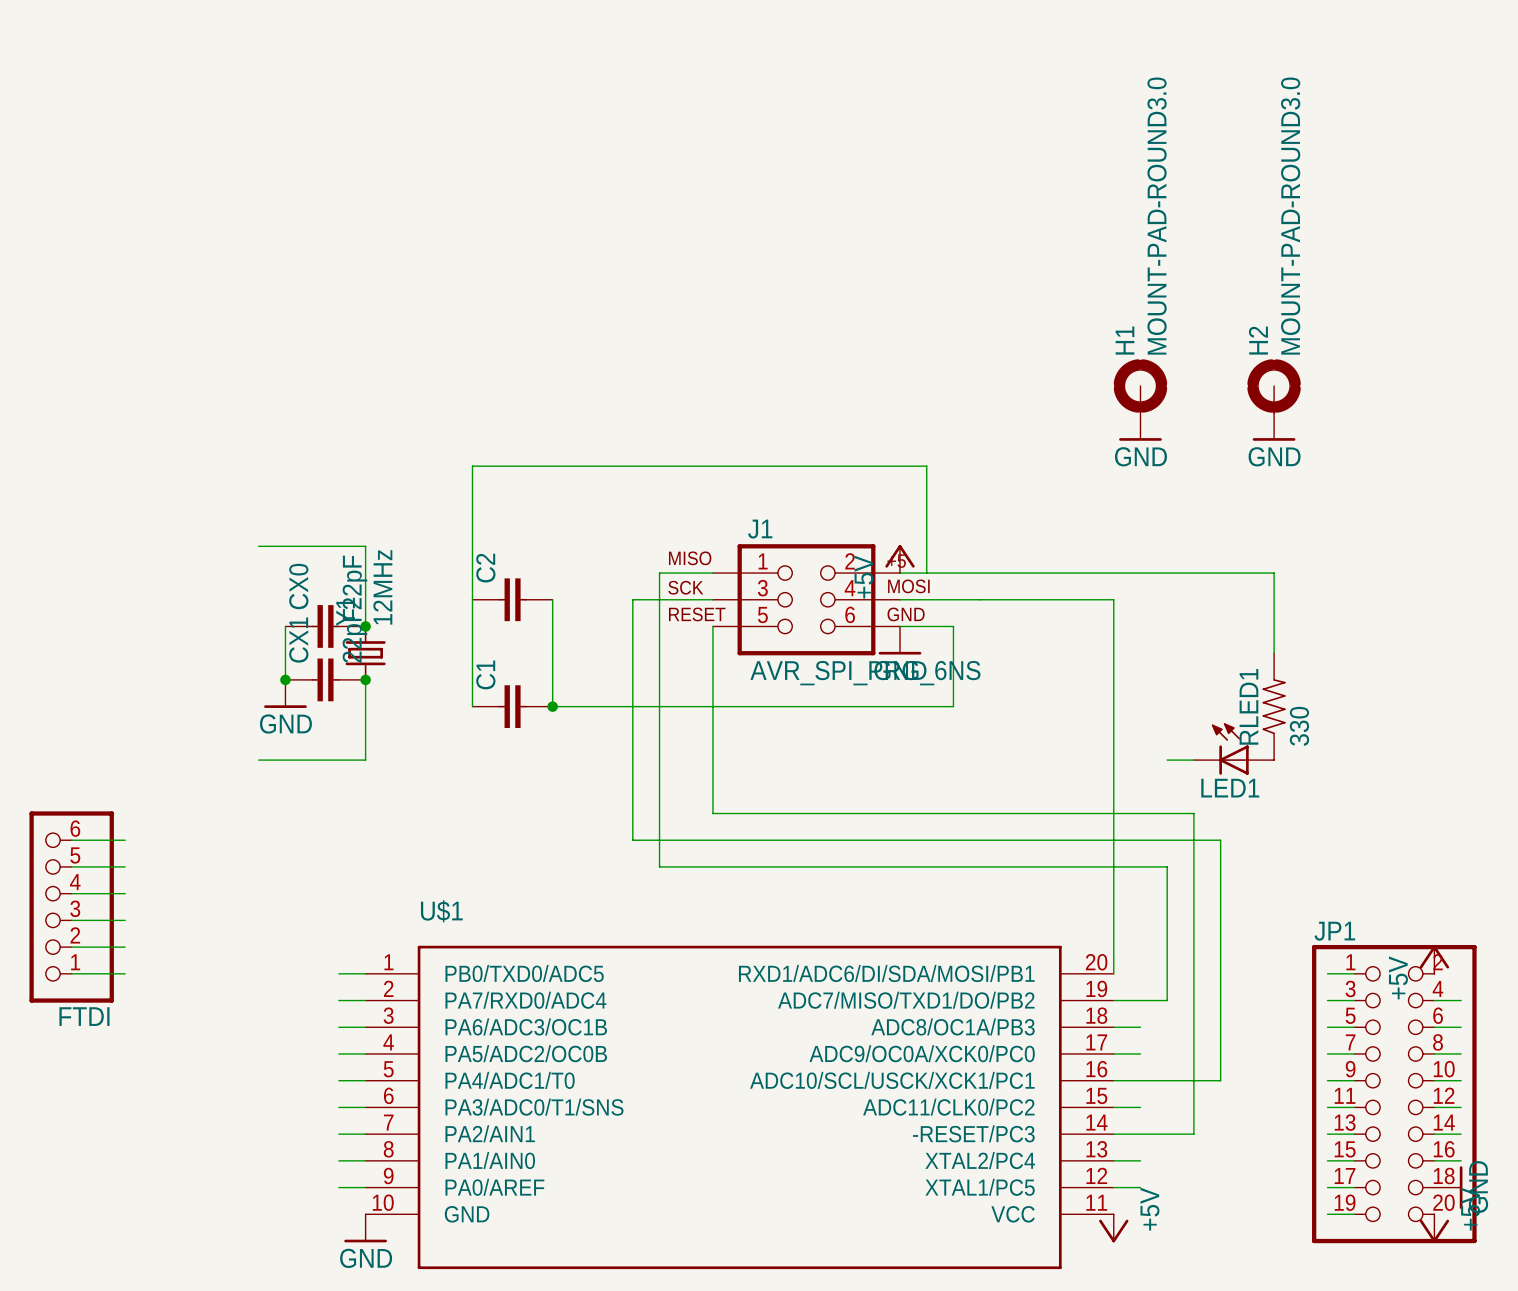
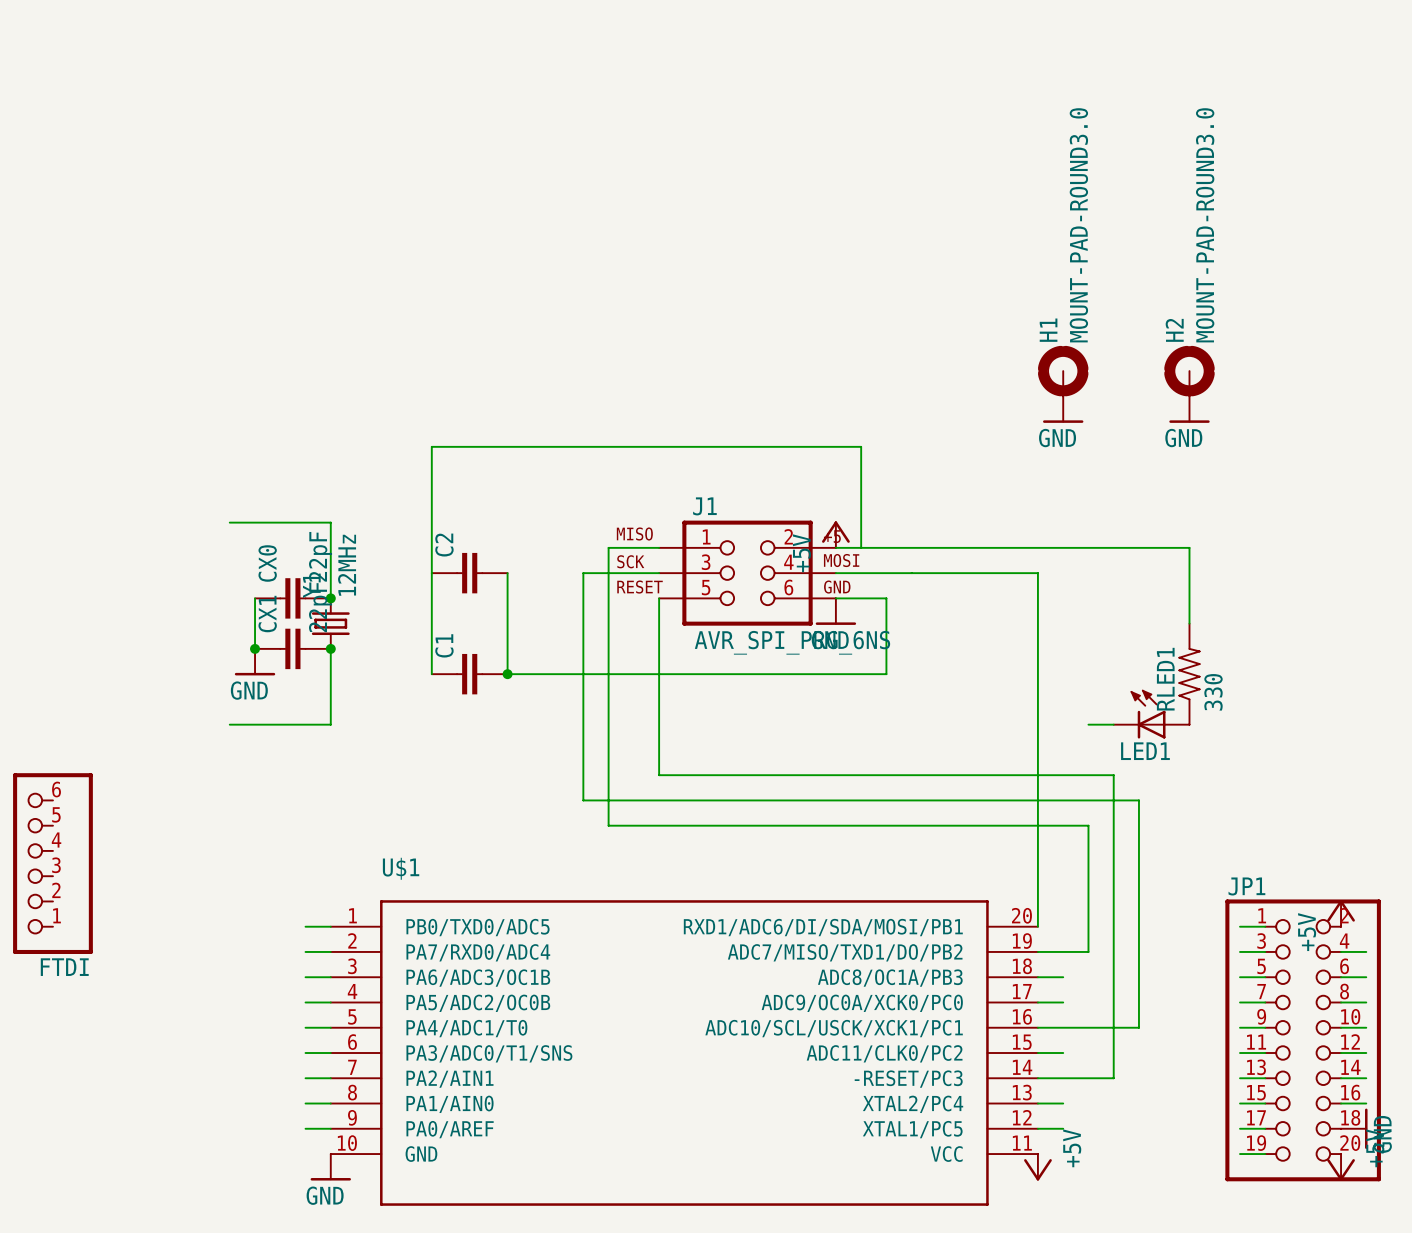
wire: (71, 840) (125, 840) -> none
wire: (71, 866) (125, 866) -> none
wire: (71, 893) (125, 893) -> none
wire: (71, 920) (125, 920) -> none
wire: (71, 947) (125, 947) -> none
wire: (71, 973) (125, 973) -> none

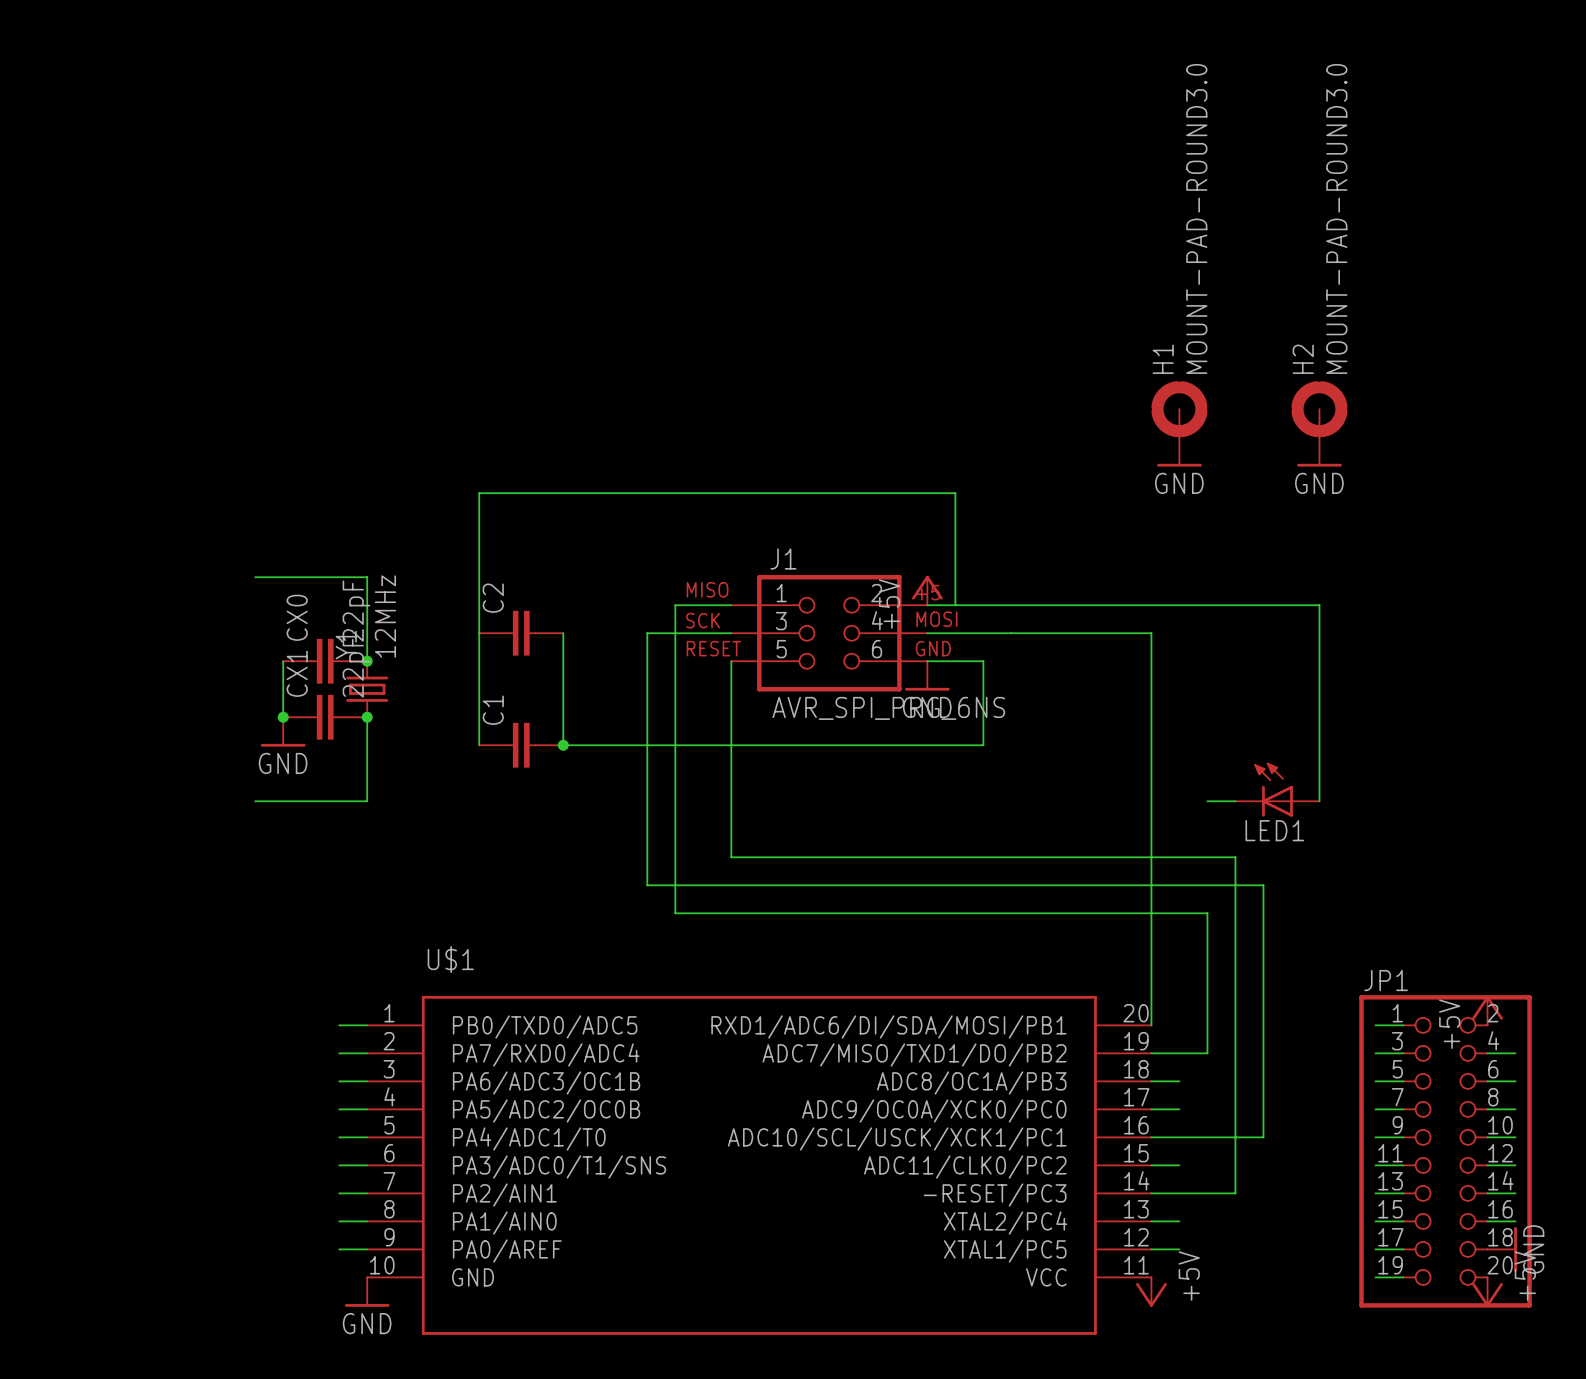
RLED1: 330 (1189, 674) -> none
FTDI: (52, 863) -> none

